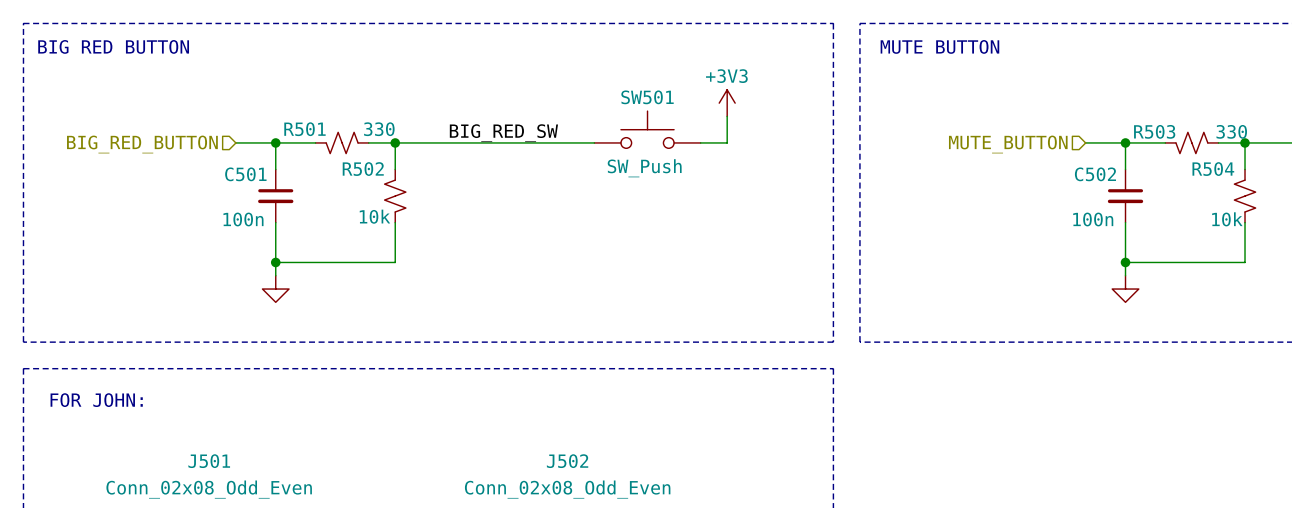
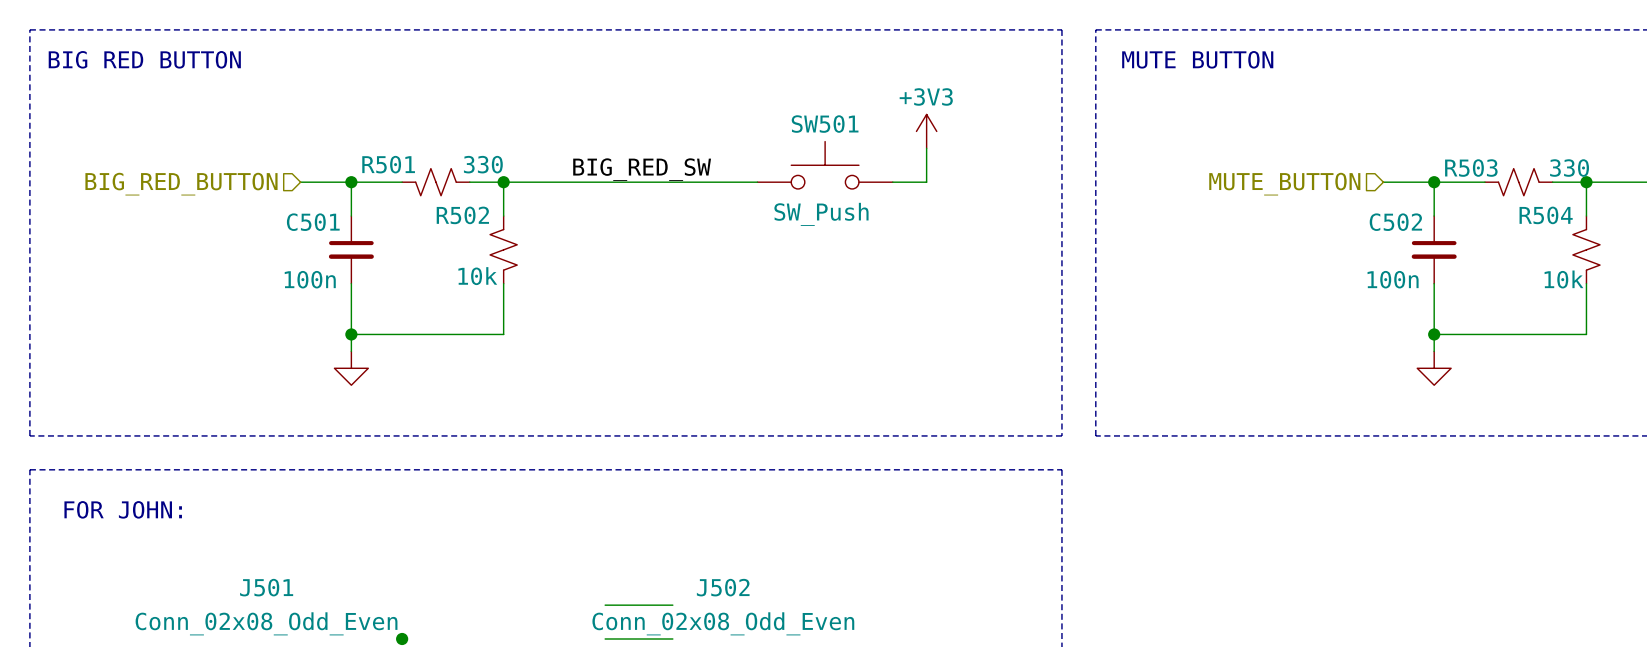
wire: none -> (605, 605) (672, 605)
junction: none -> (402, 639)
wire: none -> (605, 639) (672, 639)

